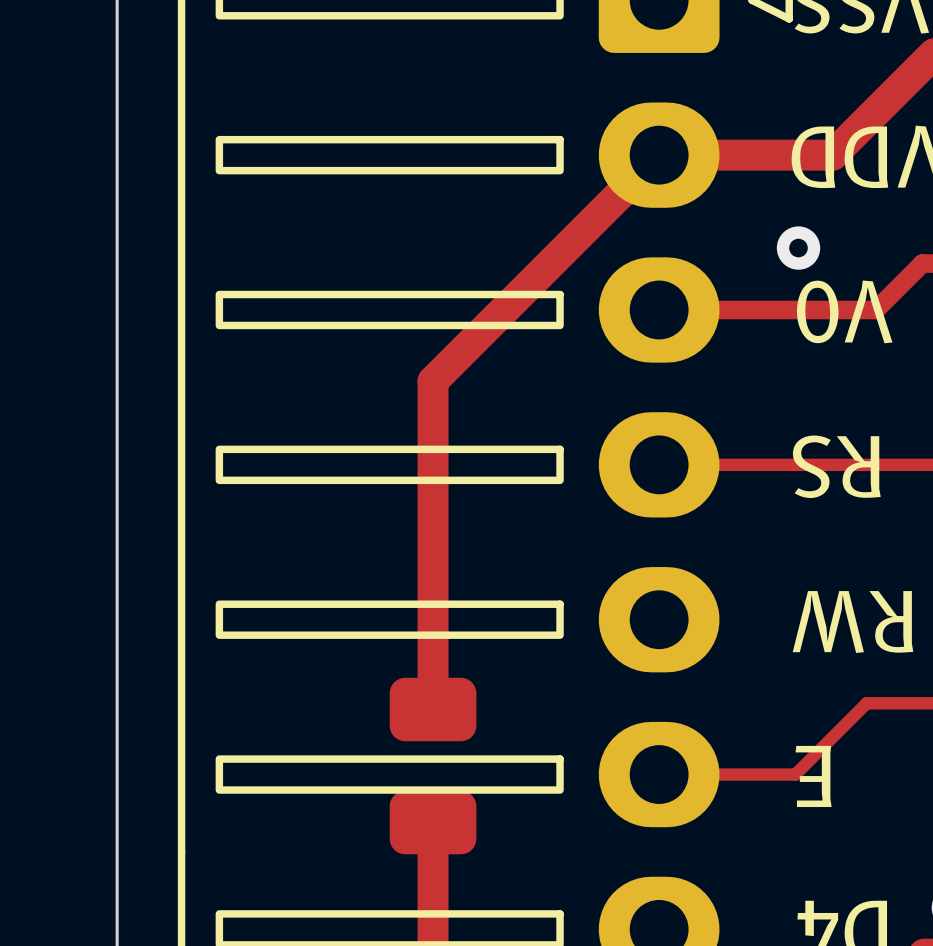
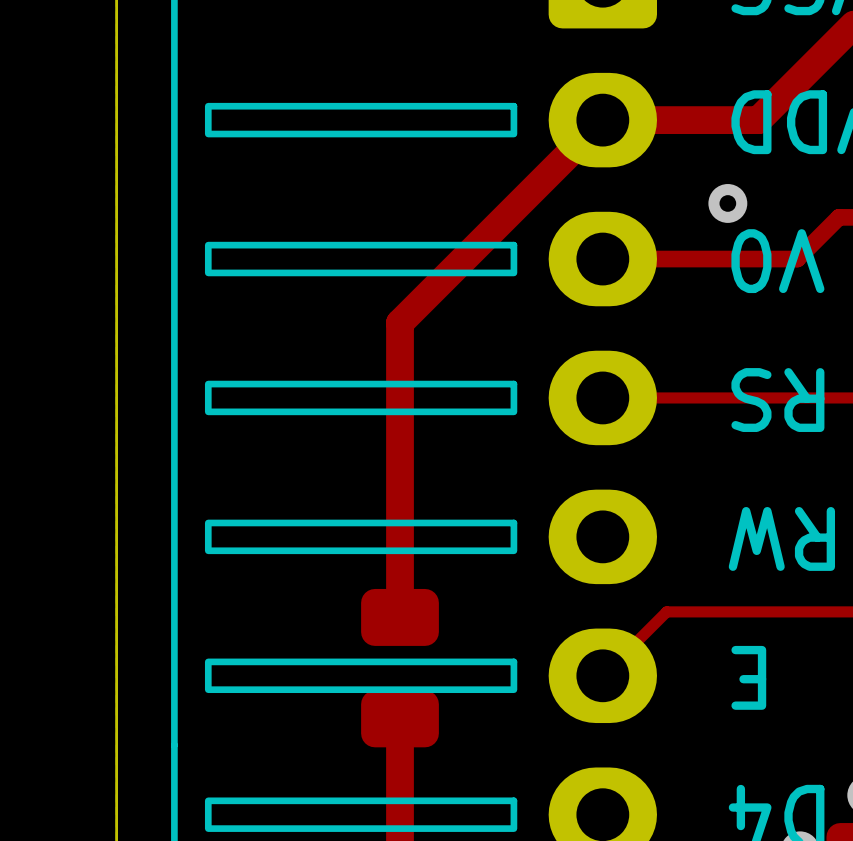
top track: (866, 703) (795, 774) (659, 774) -> (788, 611) (666, 611) (602, 675)

